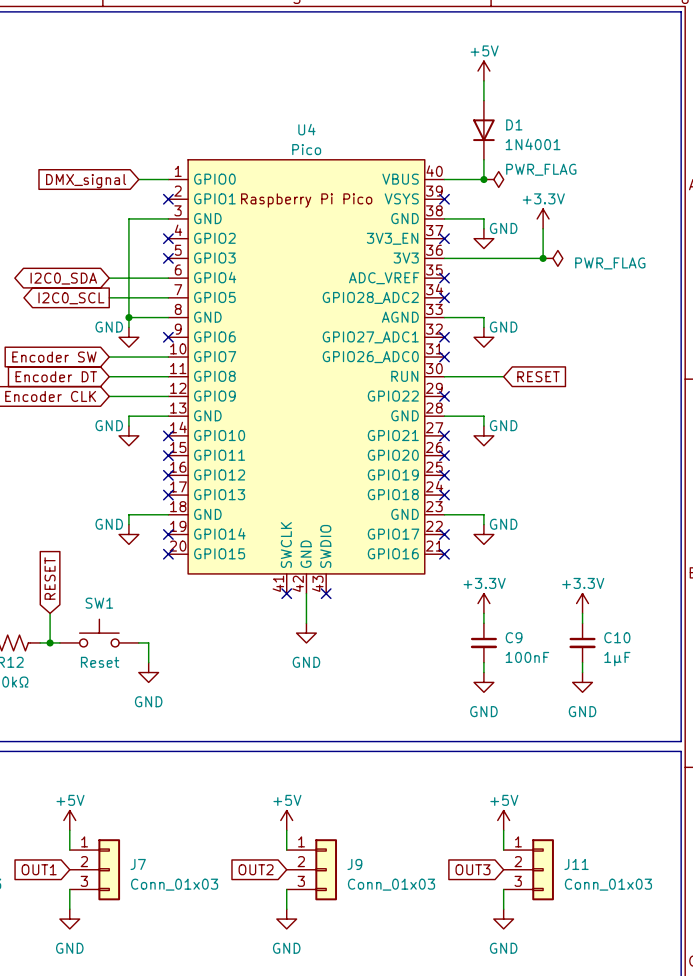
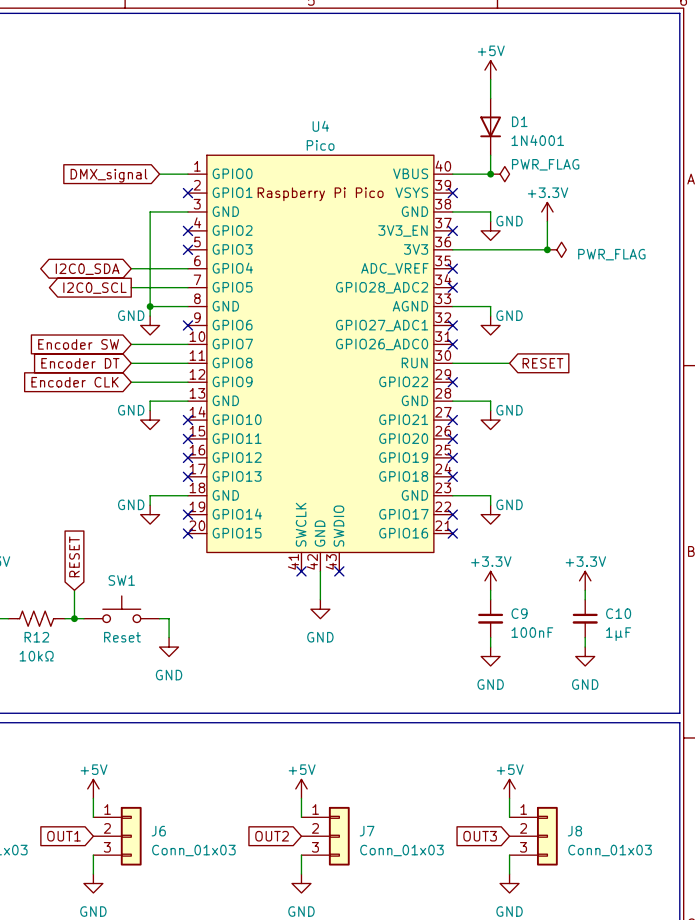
J7 name: J7 (138, 864) -> J6 (158, 831)
J9 name: J9 (354, 864) -> J7 (367, 831)
J11 name: J11 (576, 864) -> J8 (574, 831)

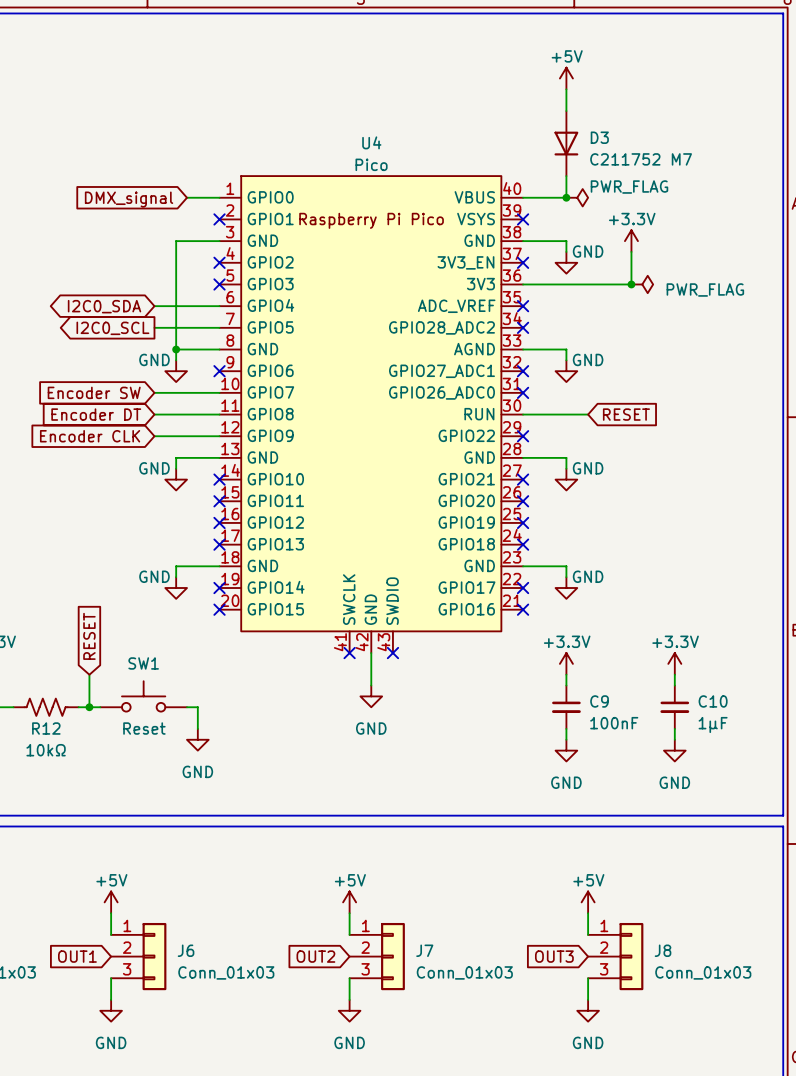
D1 name: D1 (519, 121) -> D3 (599, 137)
D1 value: 1N4001 (537, 140) -> C211752 M7 (641, 159)

